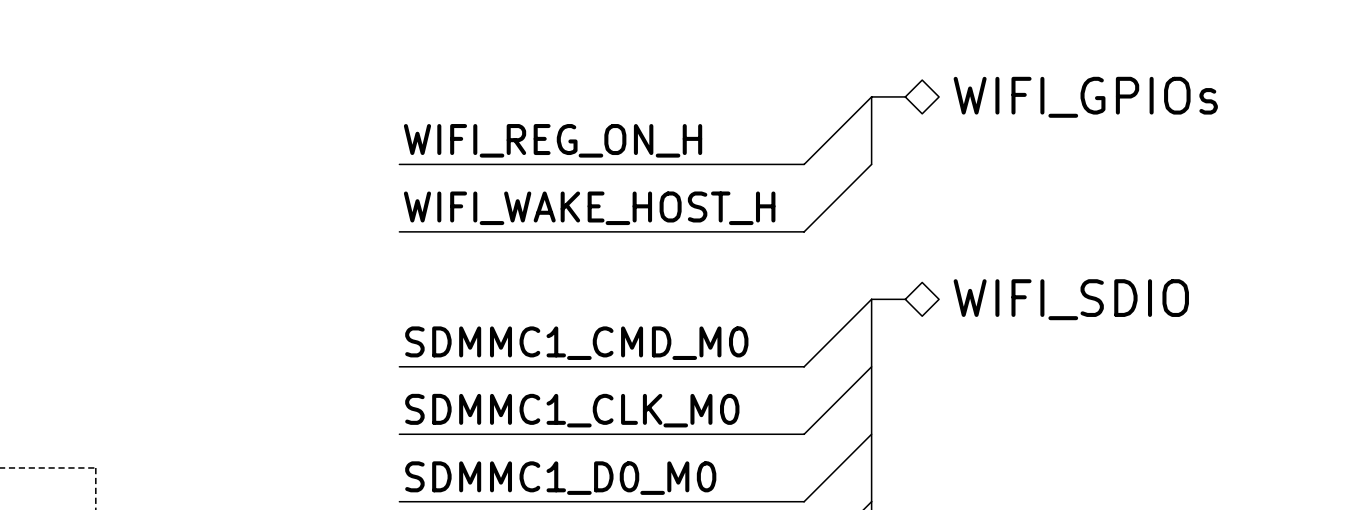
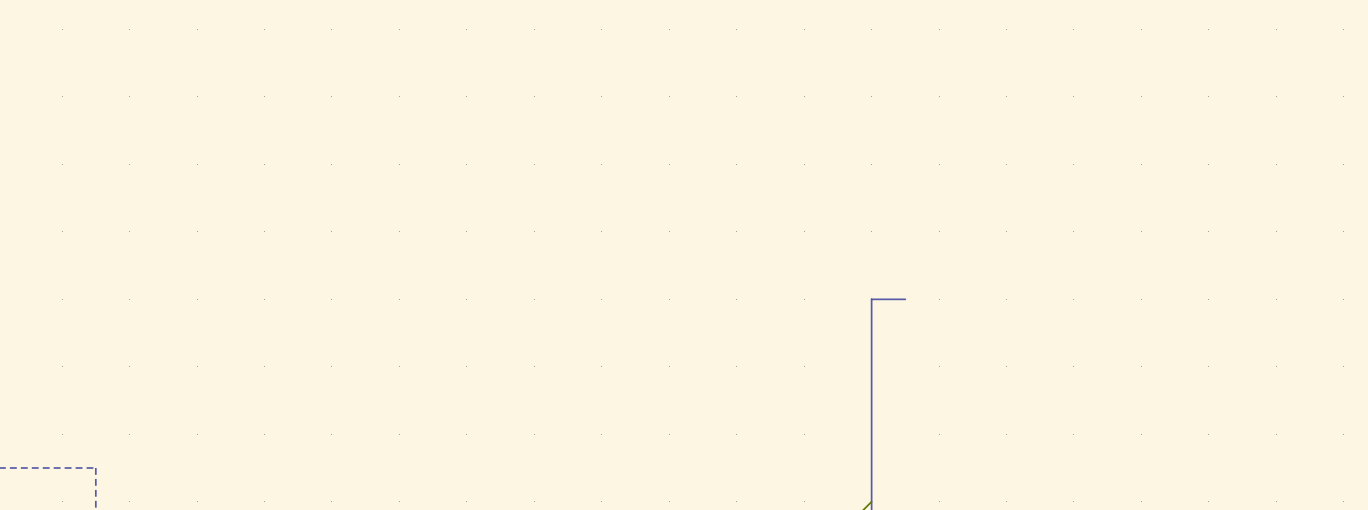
wire: (871, 96) (804, 164) (399, 164) -> none
bus: (905, 96) (871, 96) (871, 164) -> none
hierarchical label: WIFI_GPIOs (1085, 97) -> none
label: WIFI_REG_ON_H (553, 140) -> none
wire: (871, 164) (804, 231) (399, 231) -> none
label: WIFI_WAKE_HOST_H (589, 208) -> none
wire: (871, 299) (804, 366) (399, 366) -> none
hierarchical label: WIFI_SDIO (1071, 299) -> none
label: SDMMC1_CMD_M0 (576, 343) -> none
wire: (871, 366) (804, 434) (399, 434) -> none
label: SDMMC1_CLK_M0 (572, 410) -> none
wire: (871, 434) (804, 501) (399, 501) -> none
label: SDMMC1_D0_M0 (560, 478) -> none

